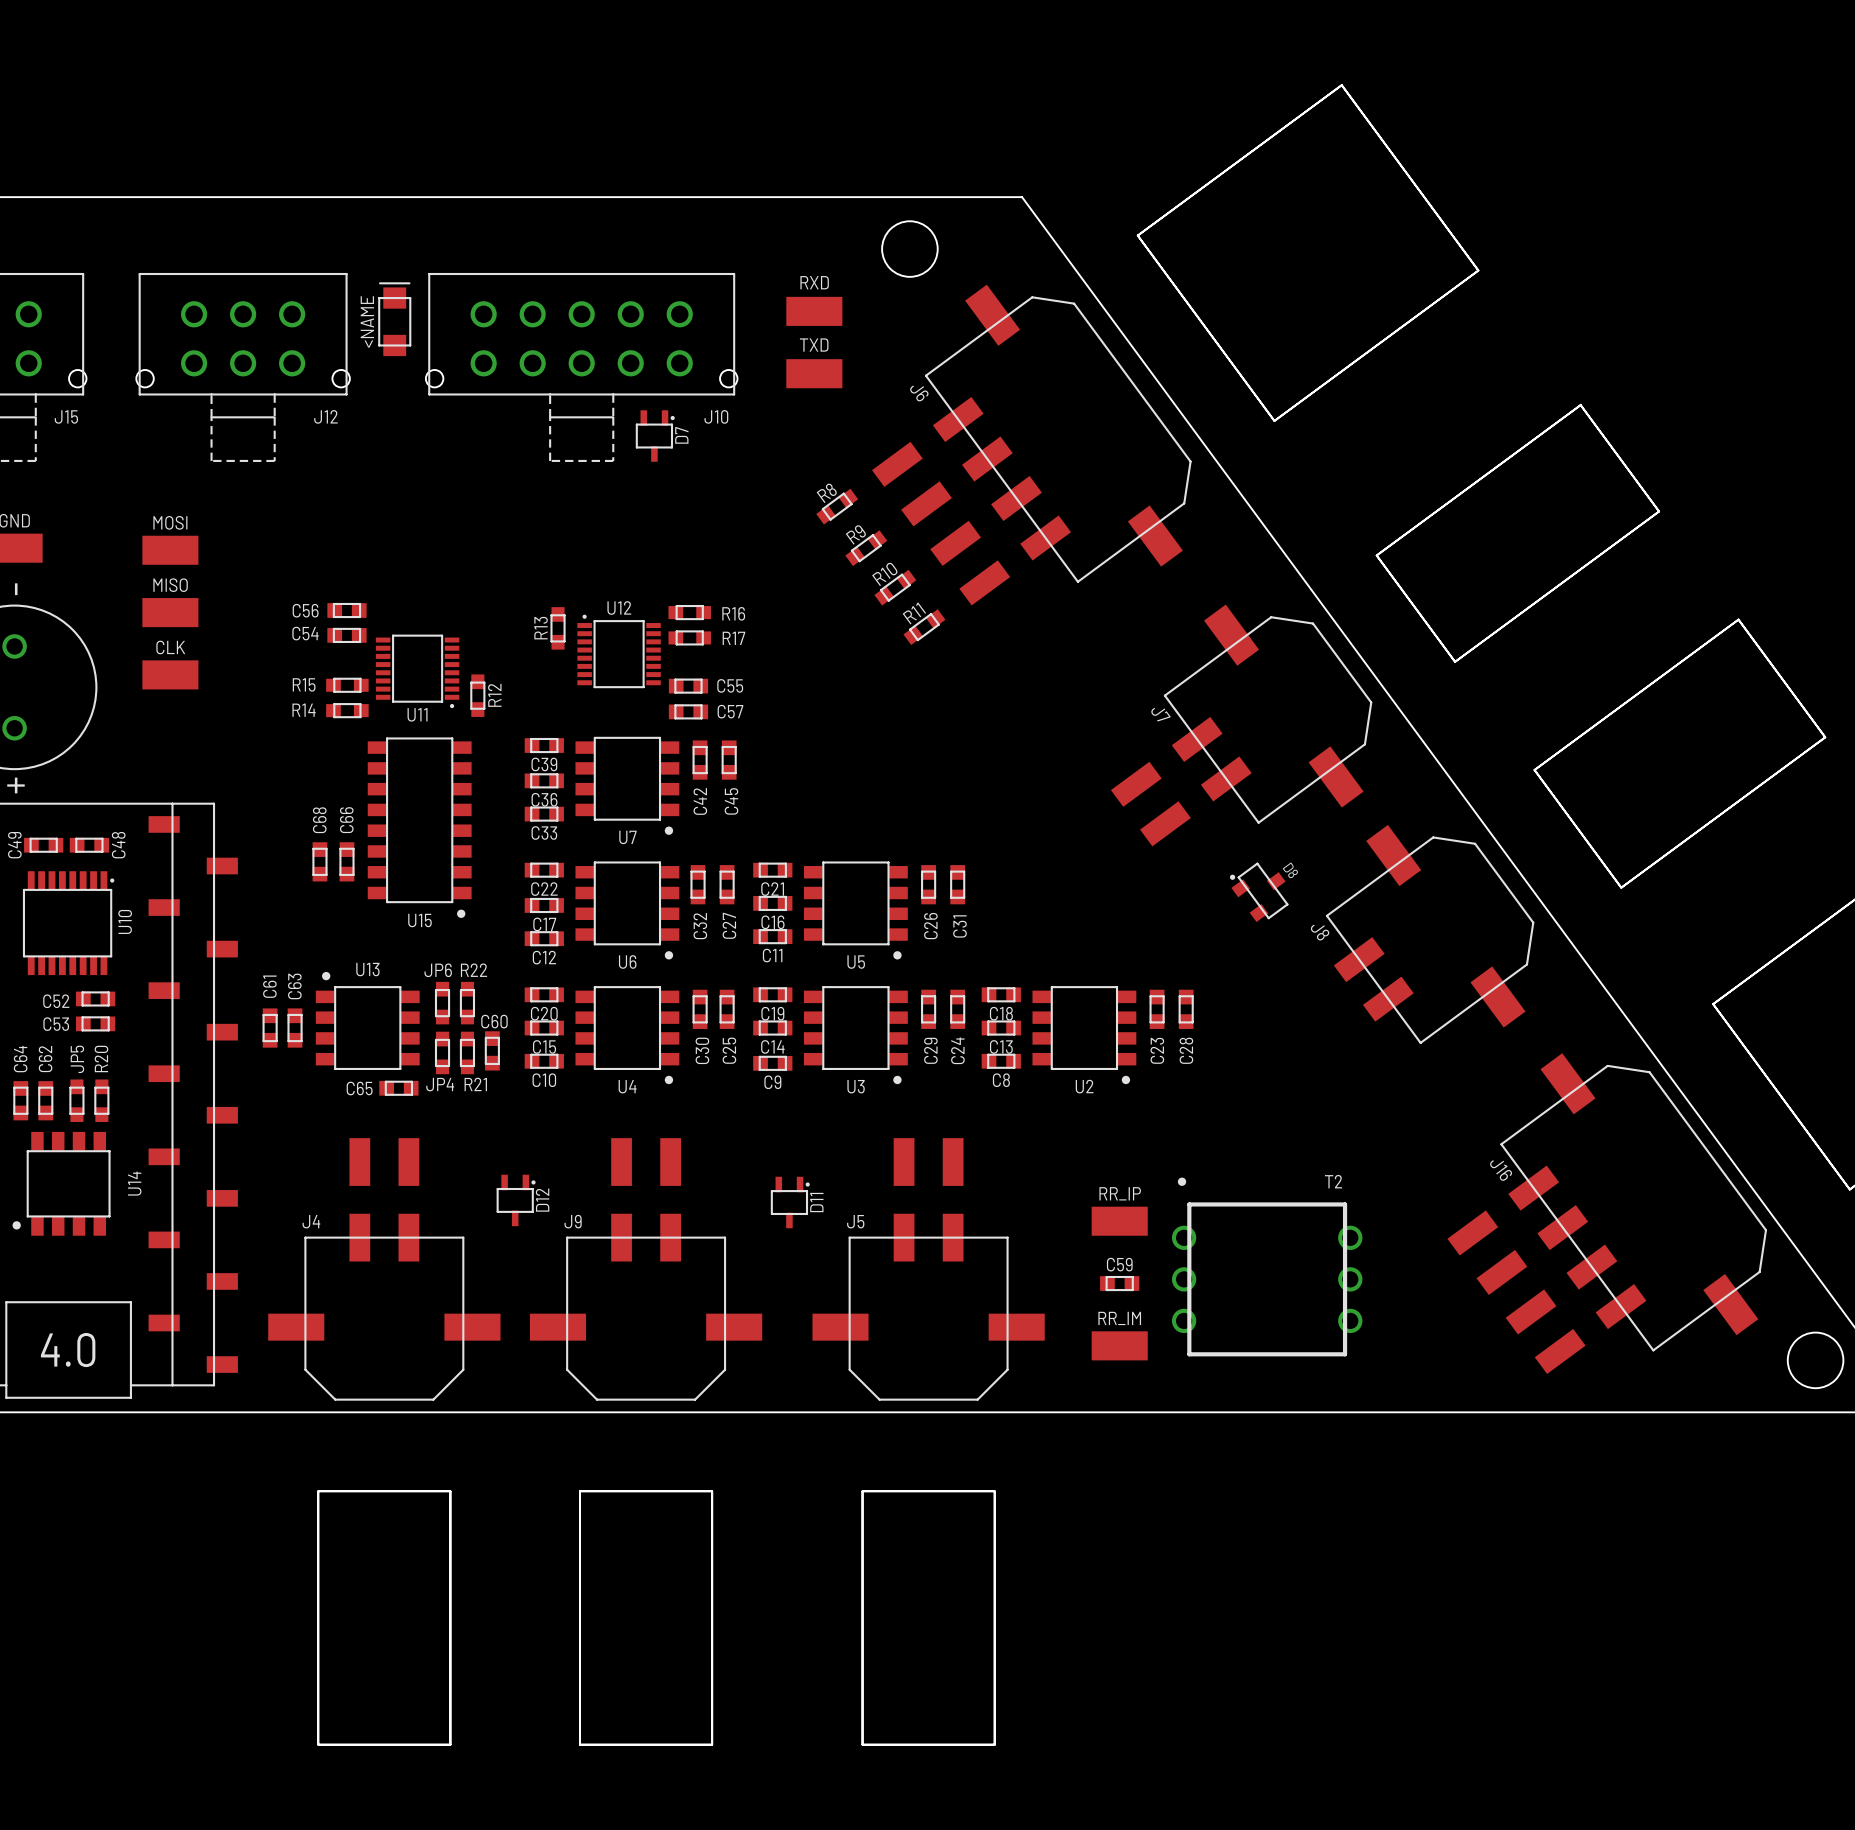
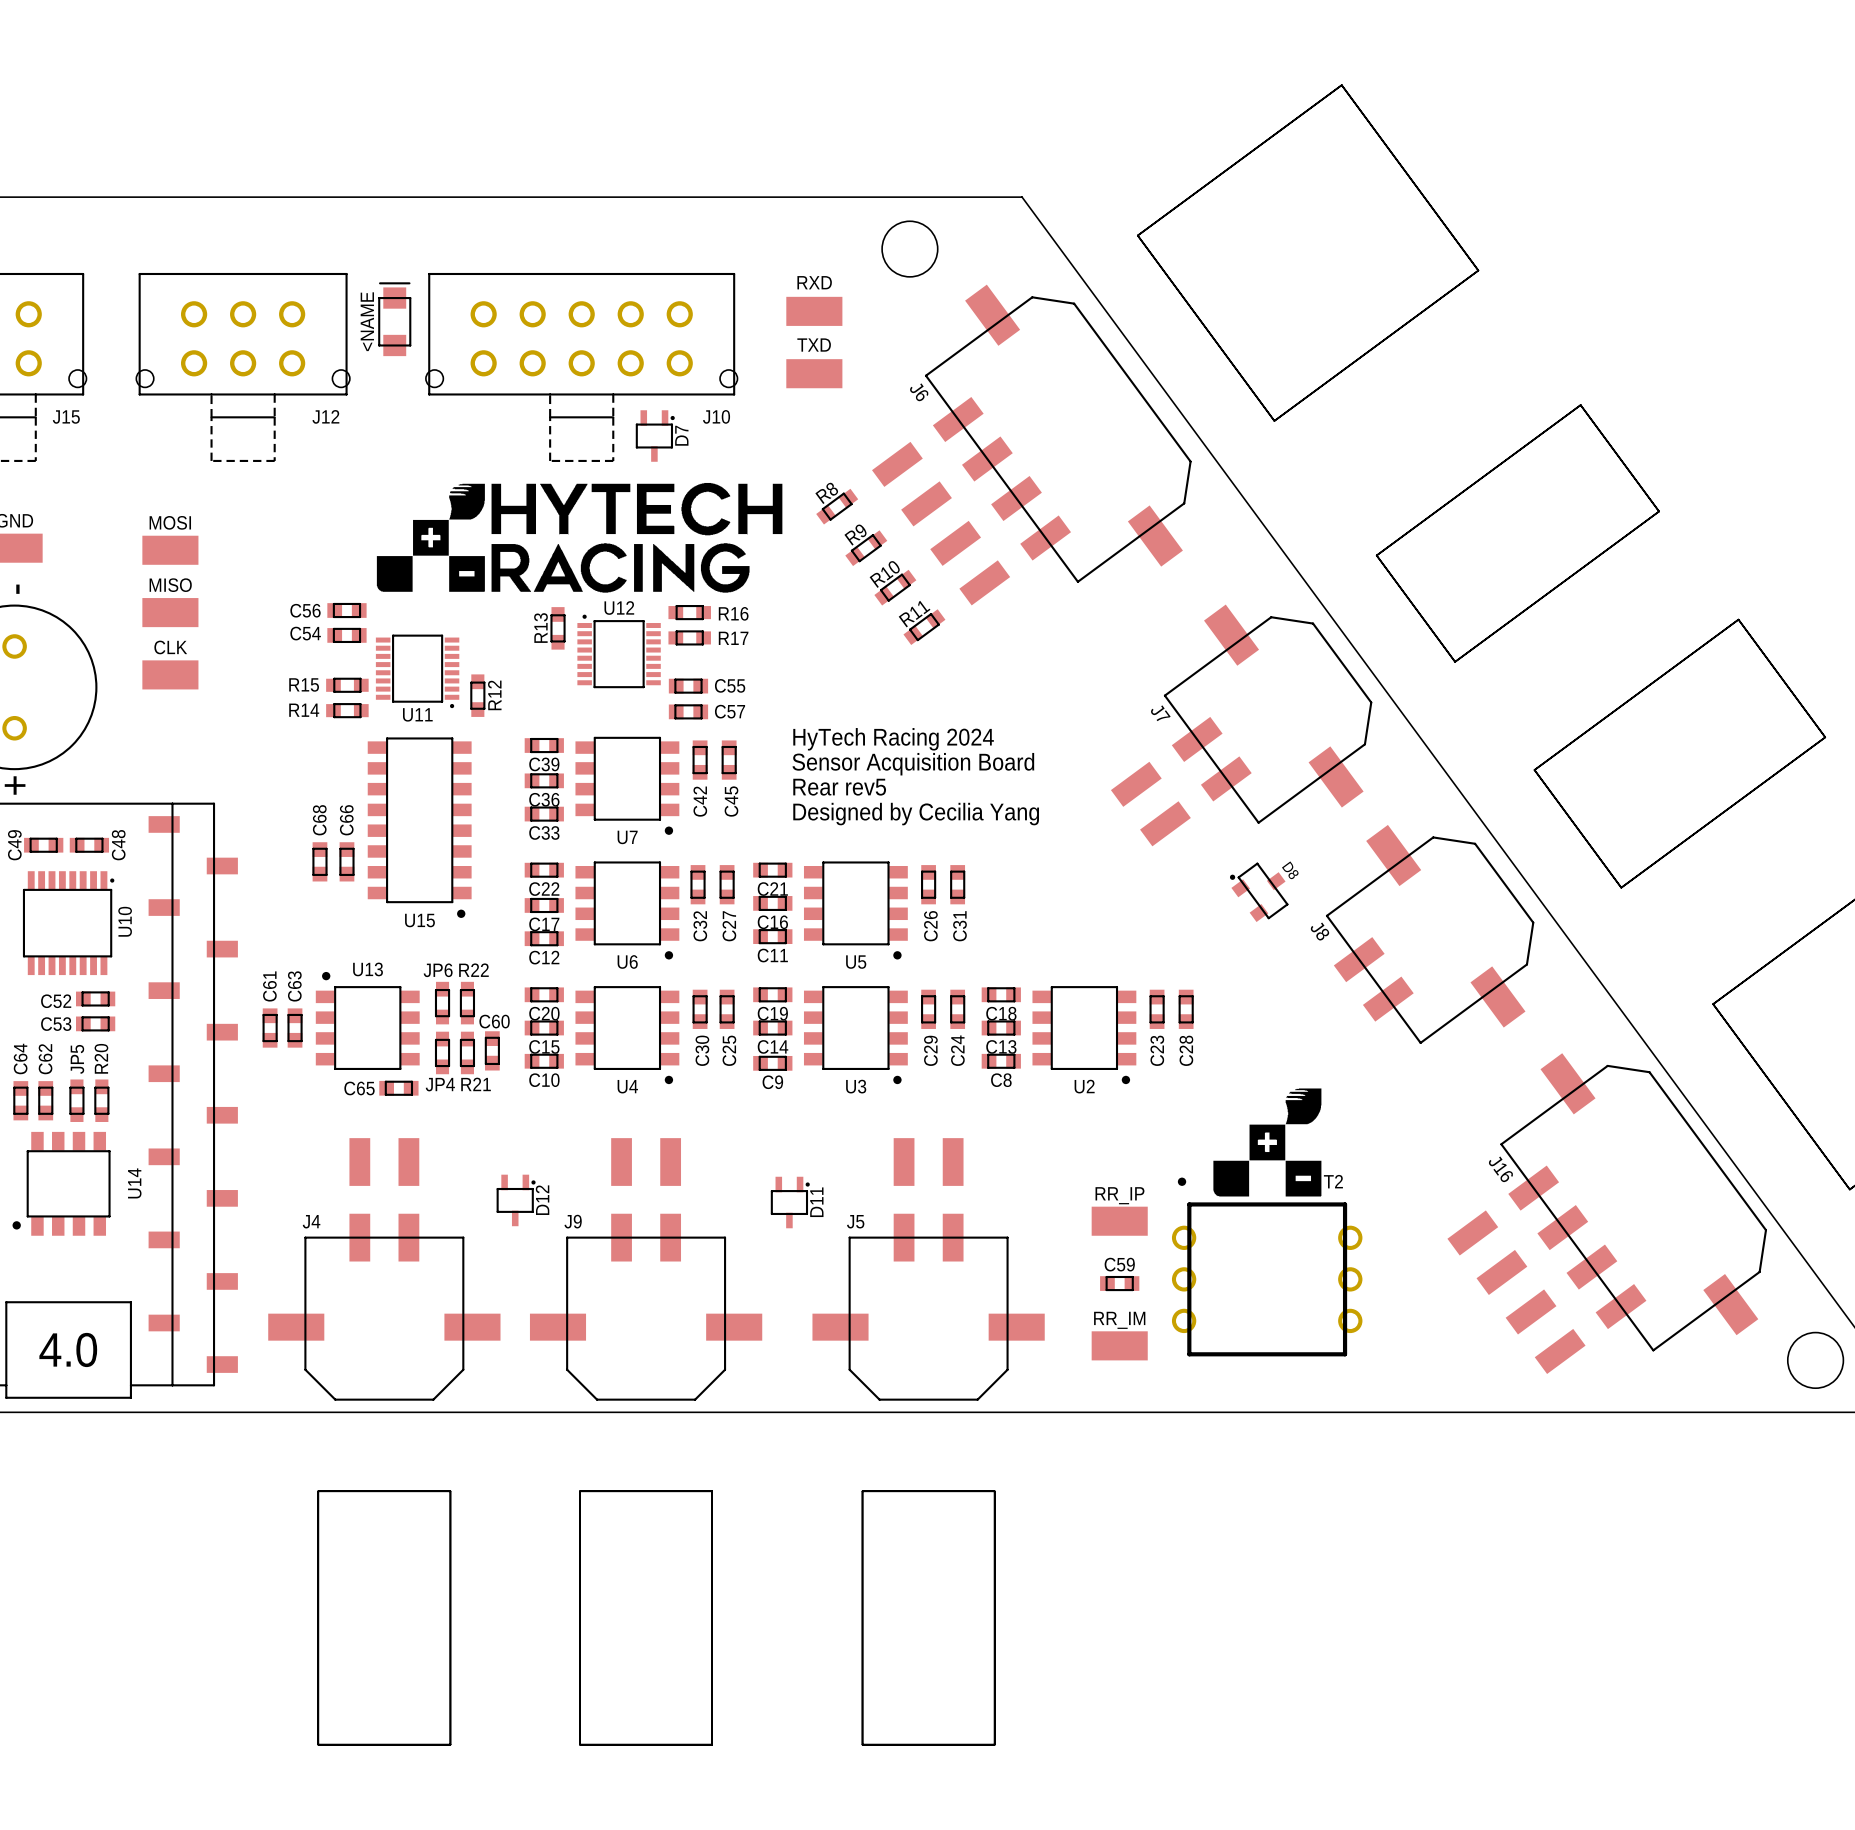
drawing: none -> [376, 482, 783, 593]
text: none -> HyTech Racing 2024 (893, 739)
text: none -> Sensor Acquisition Board (913, 764)
text: none -> Rear rev5 (839, 787)
text: none -> Designed by Cecilia Yang (916, 814)
drawing: none -> [1213, 1088, 1322, 1197]

